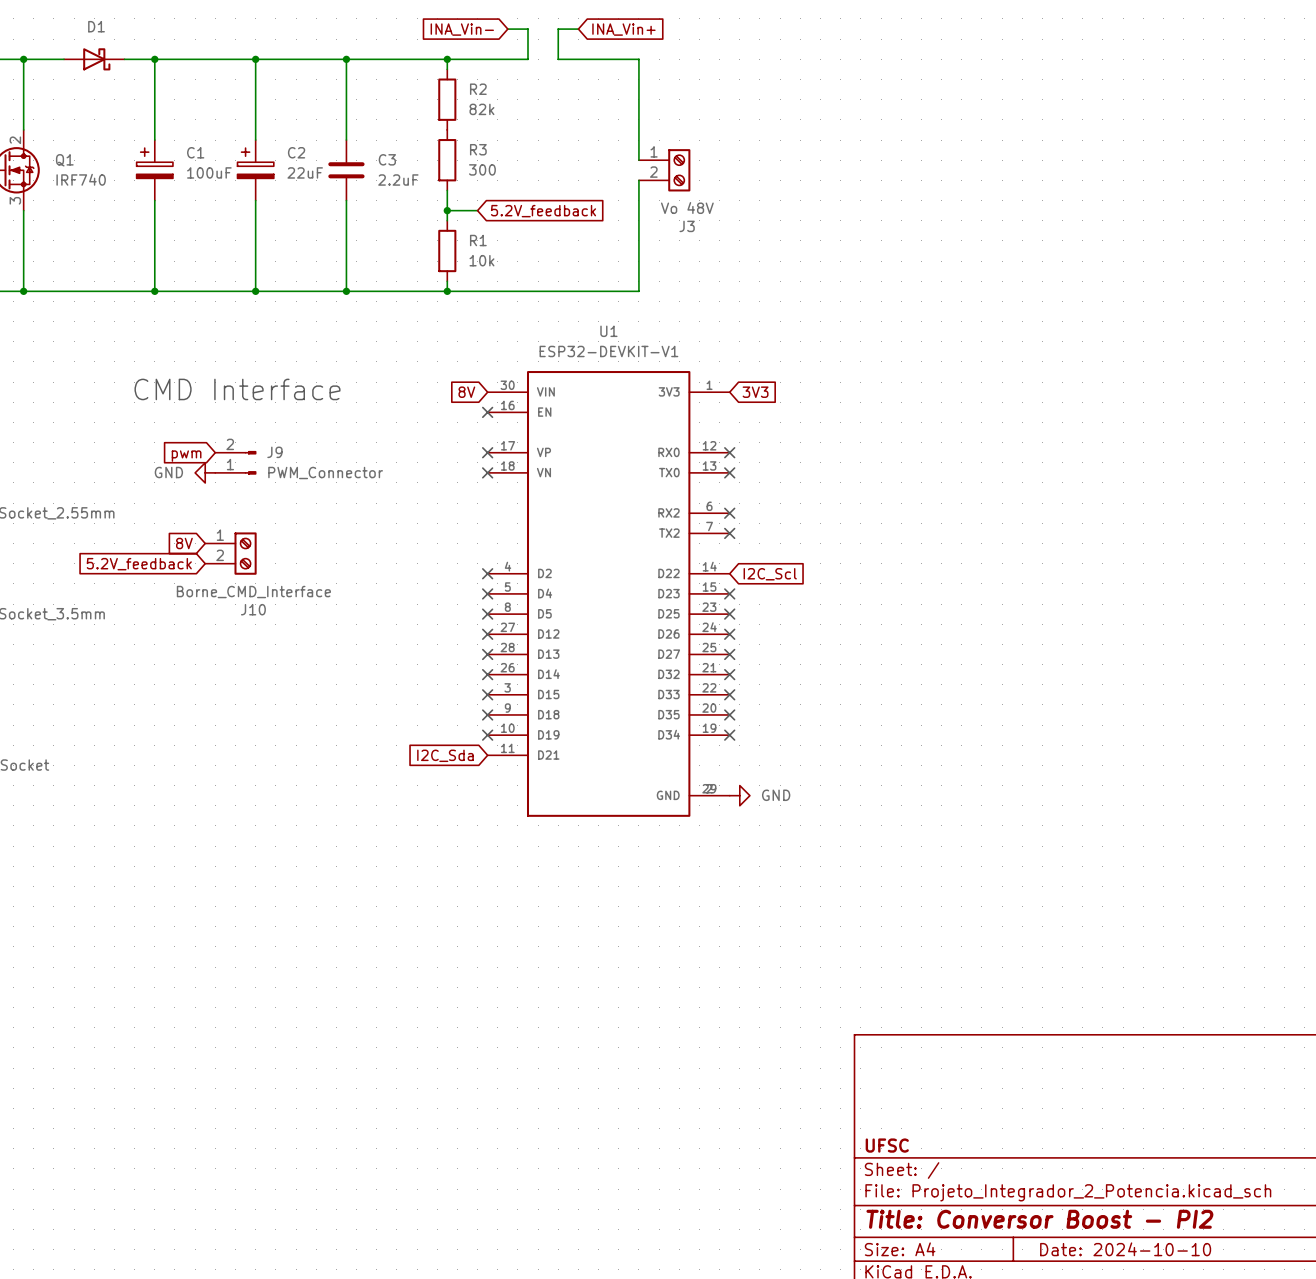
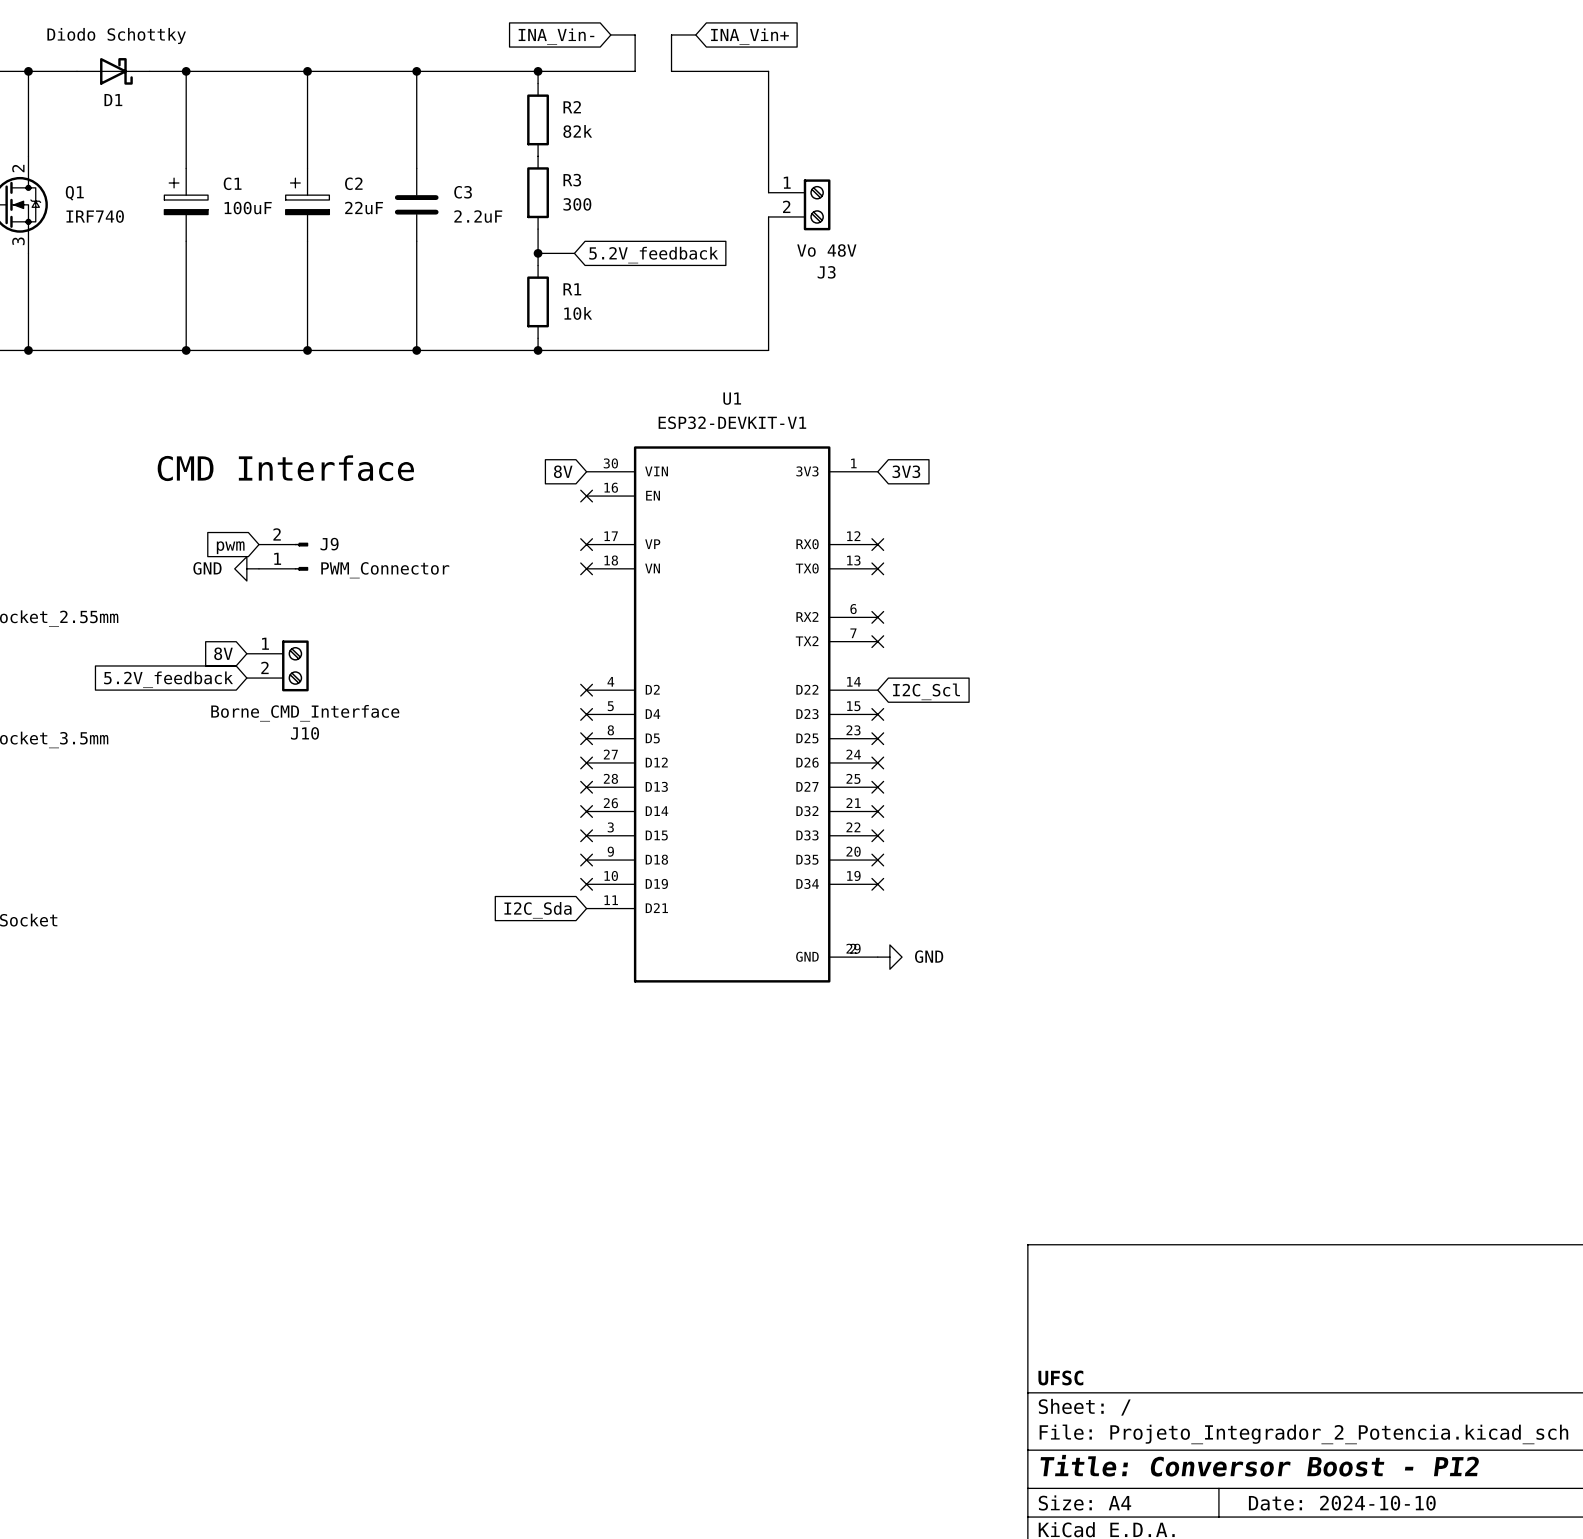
D1 name position: D1 (96, 26) -> D1 (113, 100)
D1 value: none -> Diodo Schottky (116, 36)

